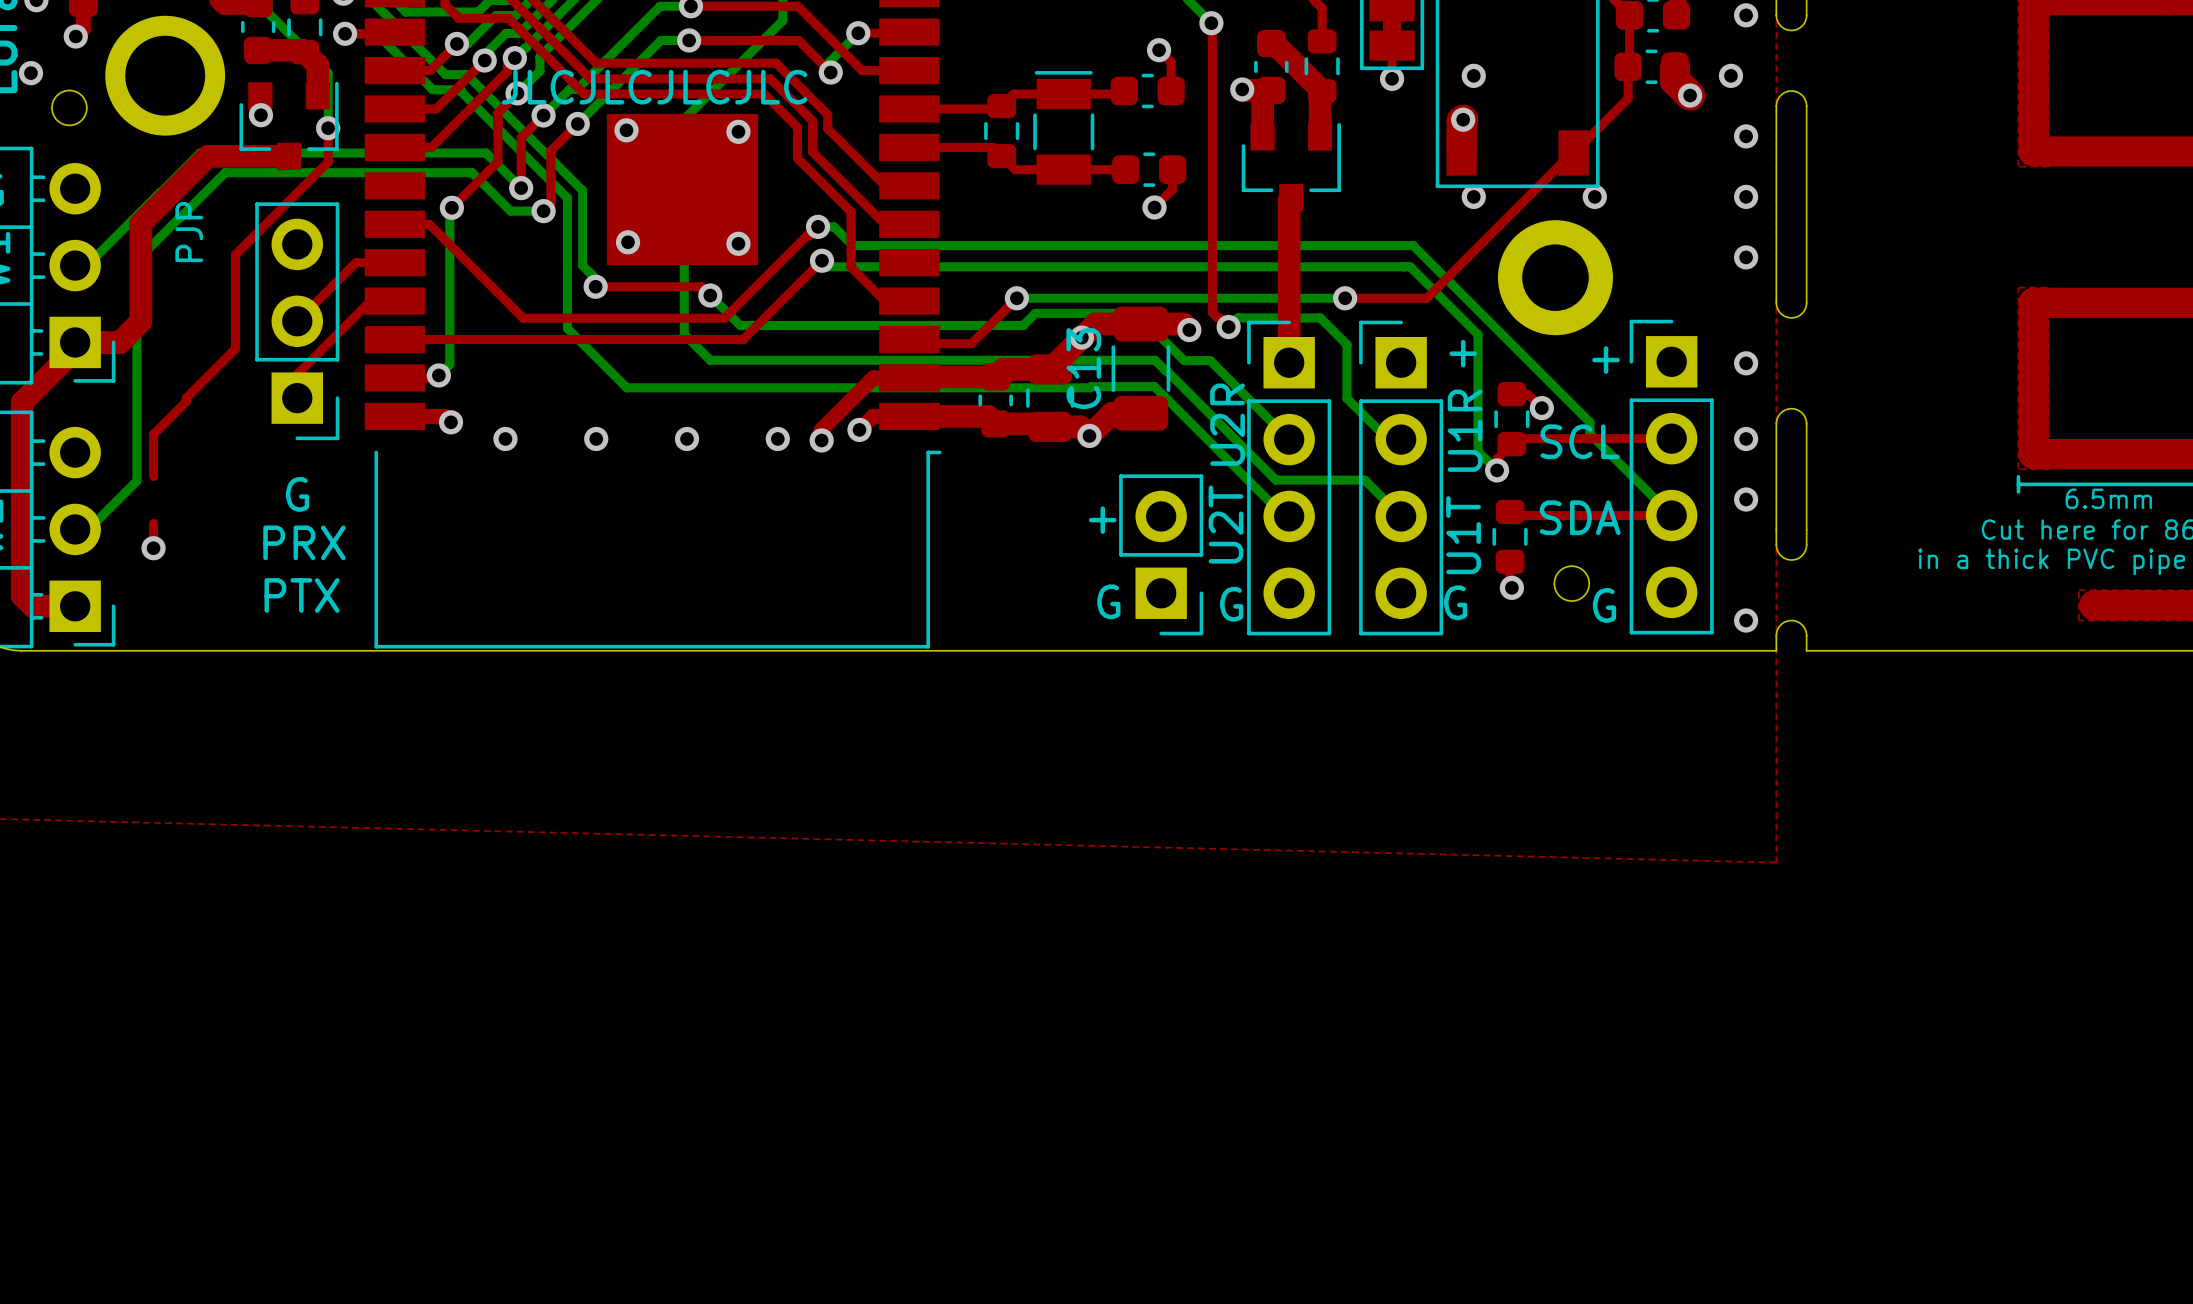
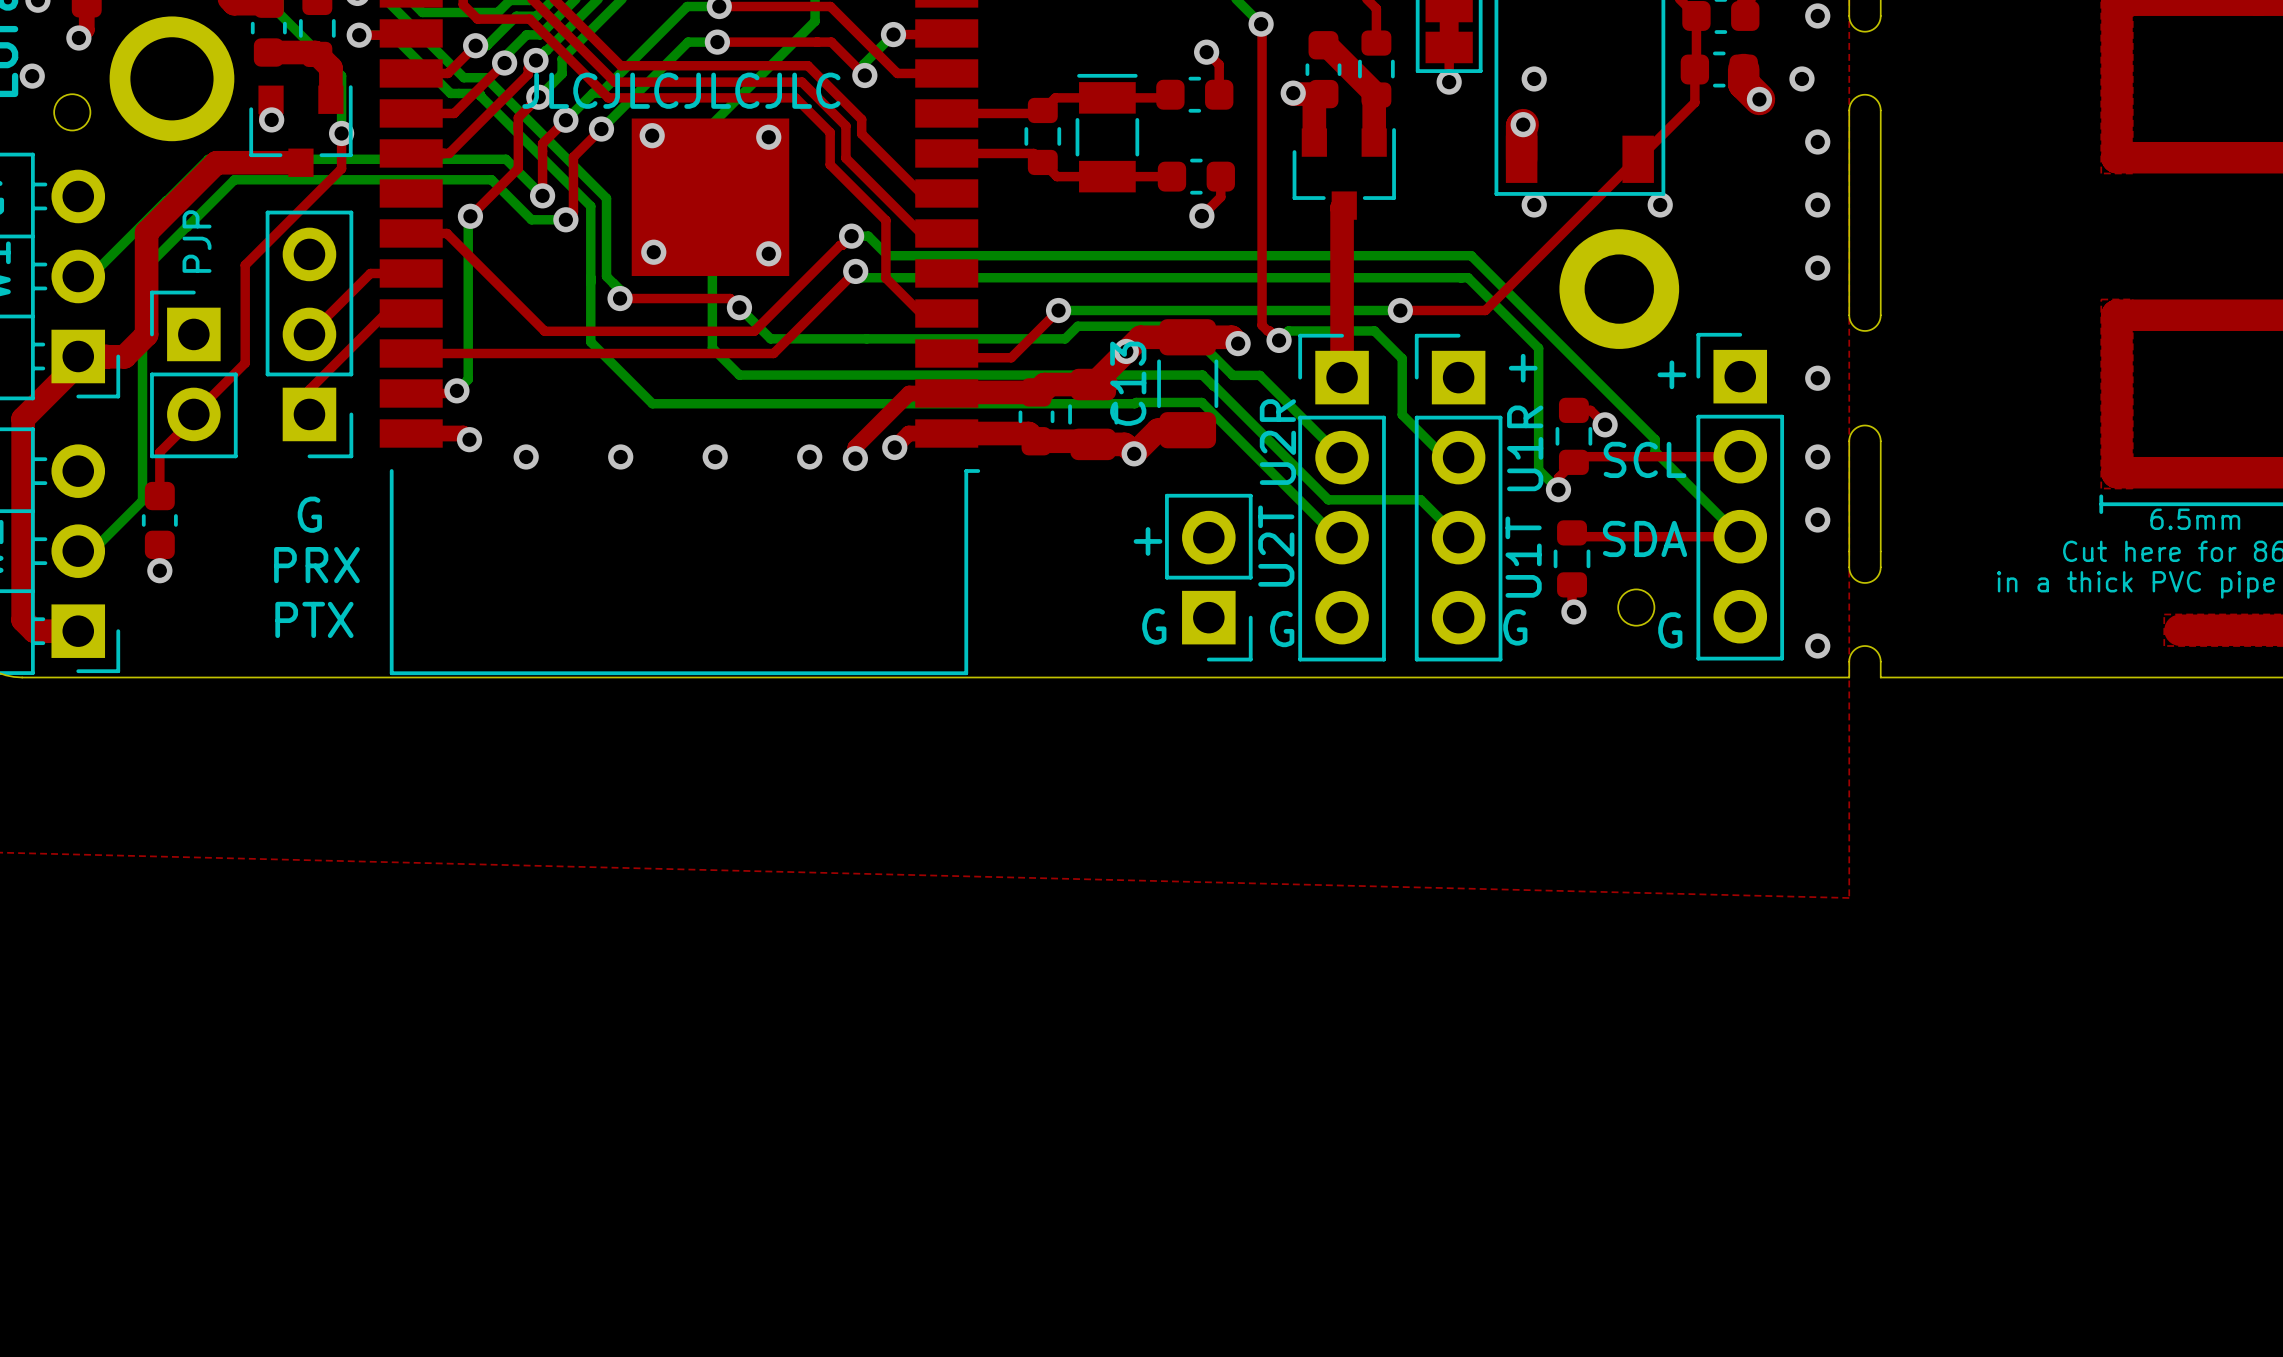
part: none -> (193, 374)
part: none -> (159, 520)

